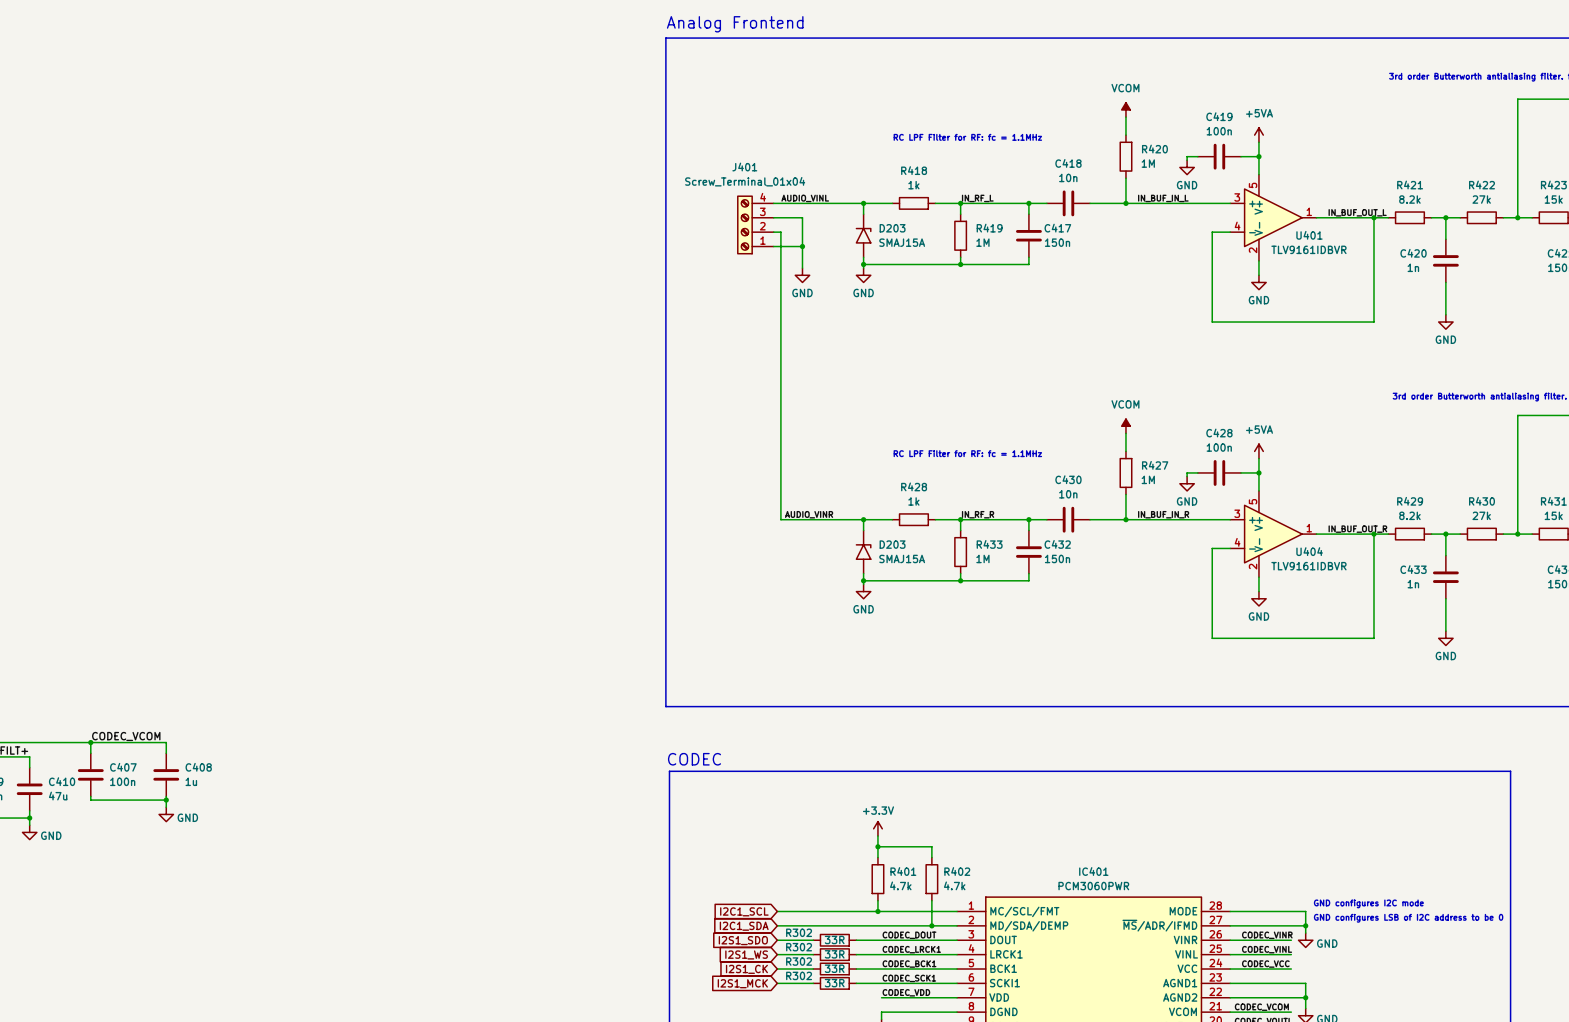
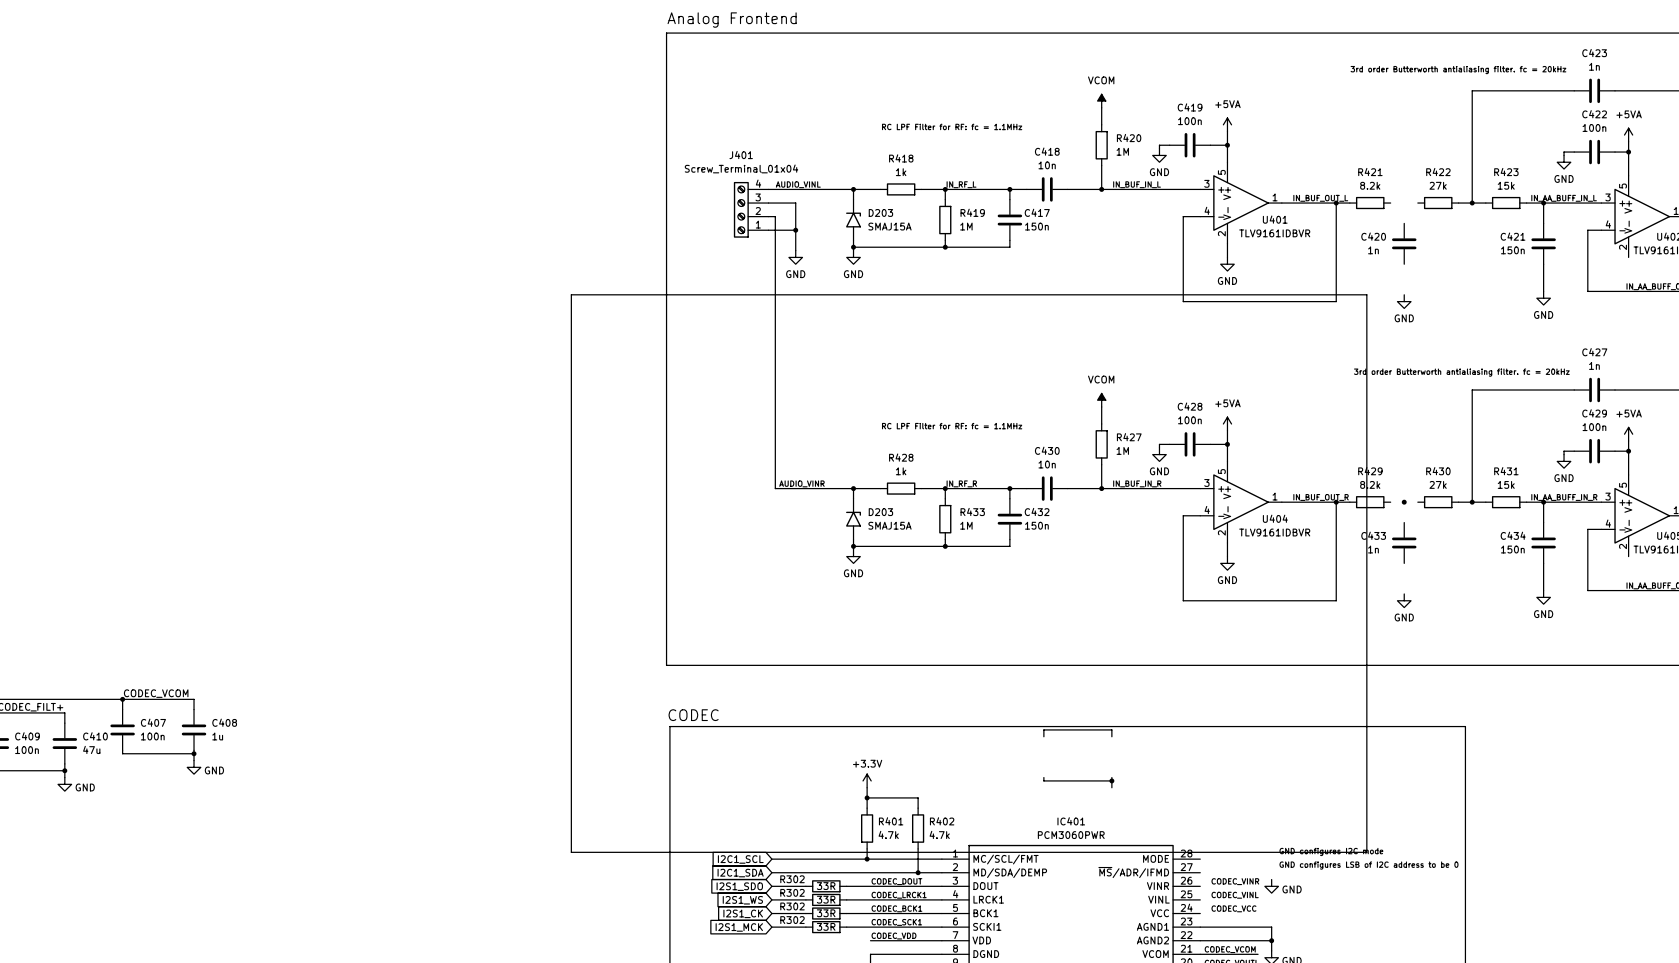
wire: (1431, 217) (1460, 217) -> none
wire: (1445, 217) (1445, 239) -> none
junction: (1445, 217) -> none
wire: (1445, 282) (1445, 314) -> none
line: none -> (571, 294) (571, 852) (1366, 852) (1366, 294) (571, 294)
wire: (1431, 534) (1460, 534) -> none
wire: (1445, 534) (1445, 555) -> none
wire: (1445, 598) (1445, 631) -> none
wire: none -> (1043, 736) (1043, 729) (1111, 729) (1111, 736)
wire: none -> (1043, 777) (1043, 780) (1111, 780)
wire: none -> (1111, 777) (1111, 787)
junction: none -> (1111, 780)
wire: (1230, 911) (1305, 911) (1305, 933) -> none
wire: (1230, 925) (1305, 925) -> none
junction: (1305, 925) -> none
wire: (1230, 940) (1291, 940) -> none
wire: (1230, 954) (1291, 954) -> none
wire: (1230, 969) (1291, 969) -> none

